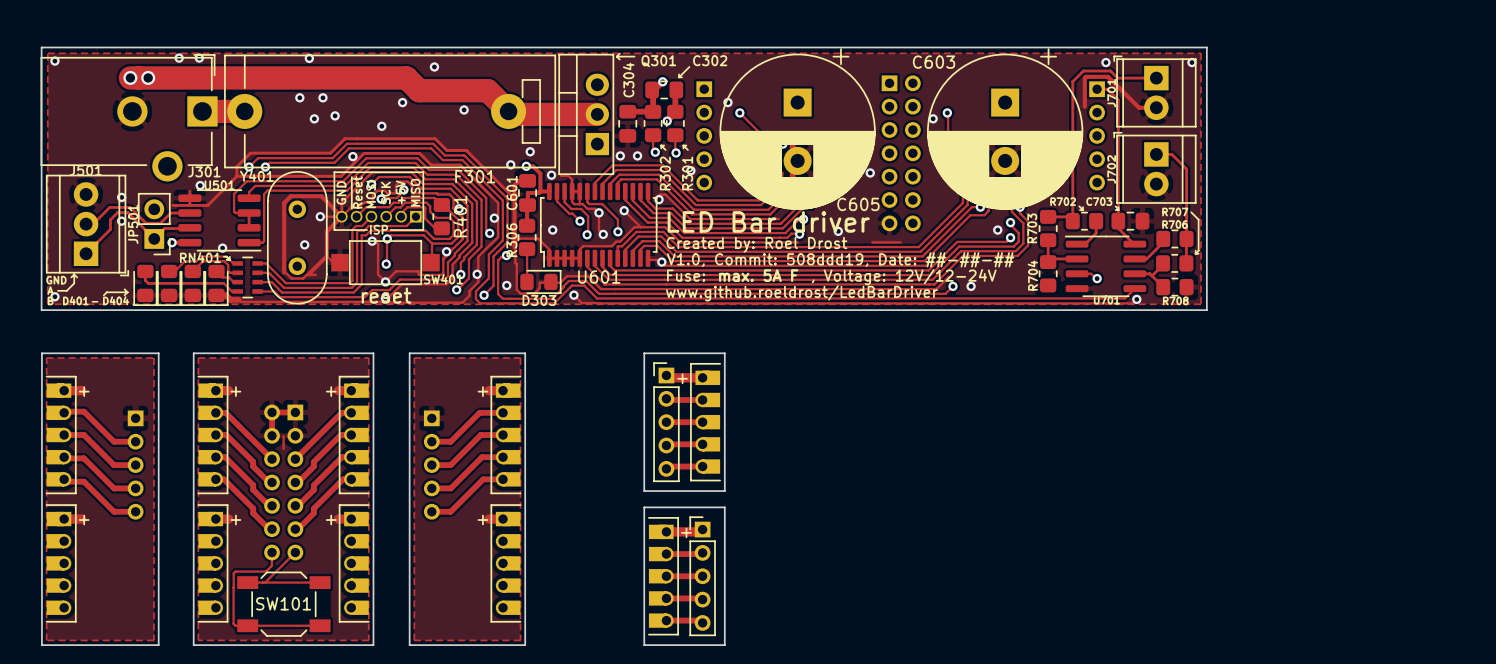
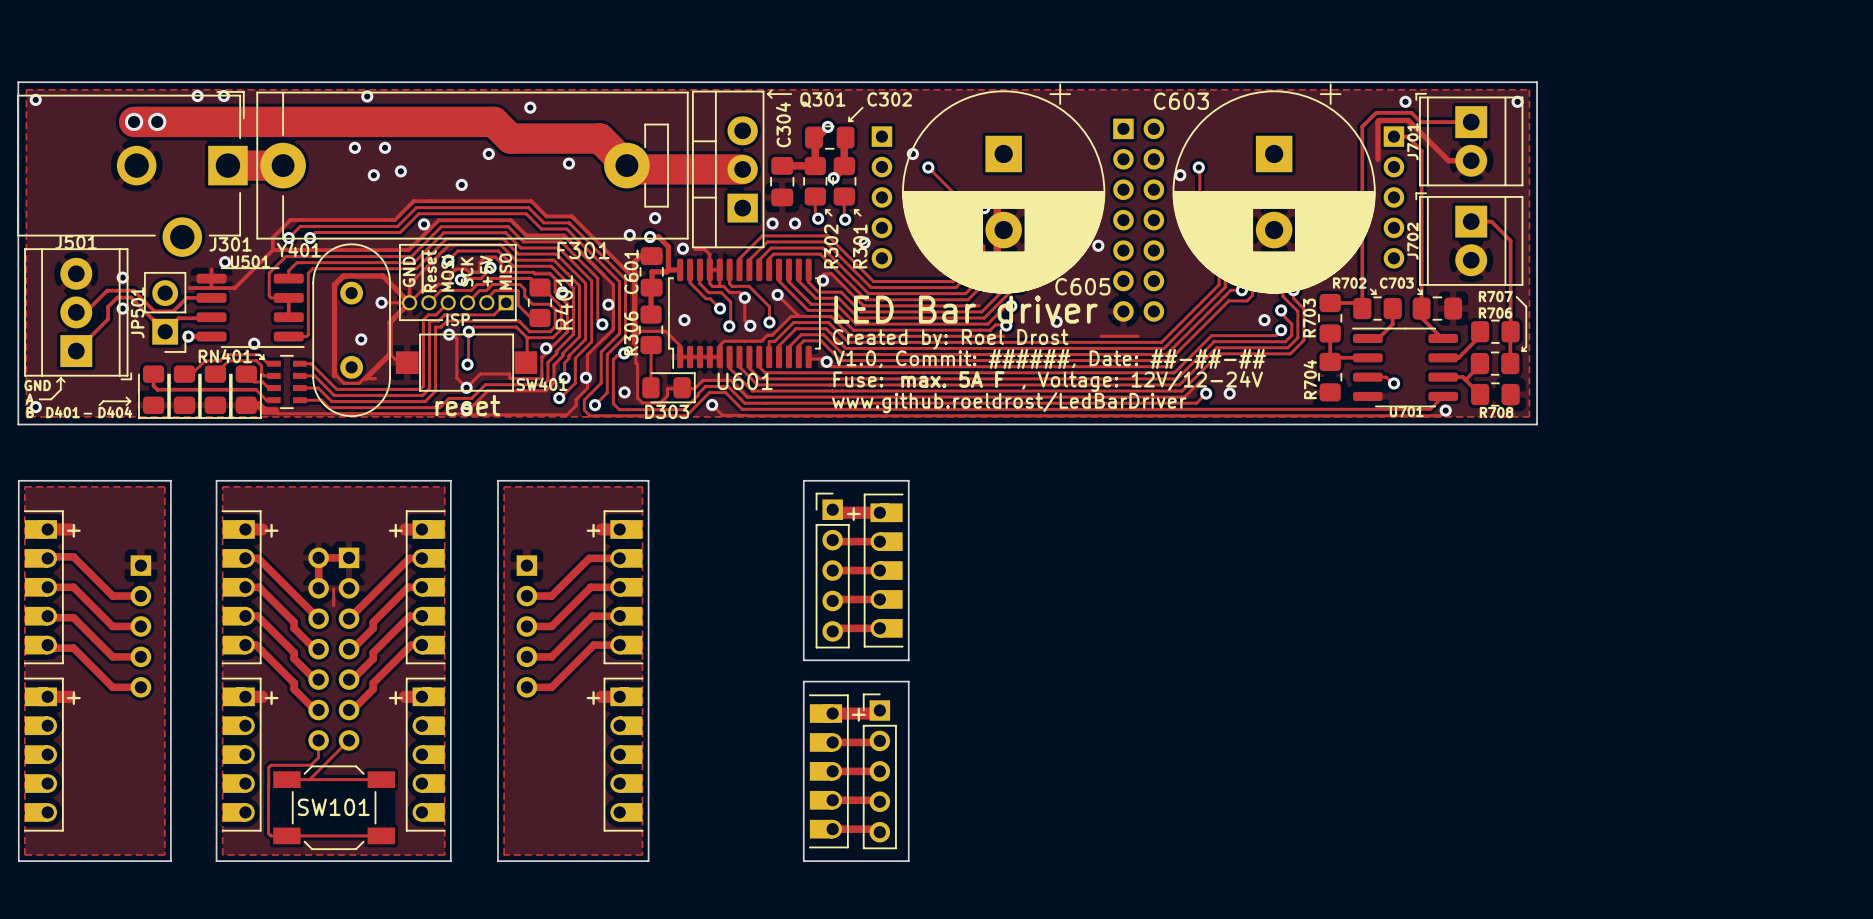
text: V1.0, Commit: 508ddd19, Date: ##-##-## (840, 259) -> V1.0, Commit: ######, Date: ##-##-## (1049, 358)

